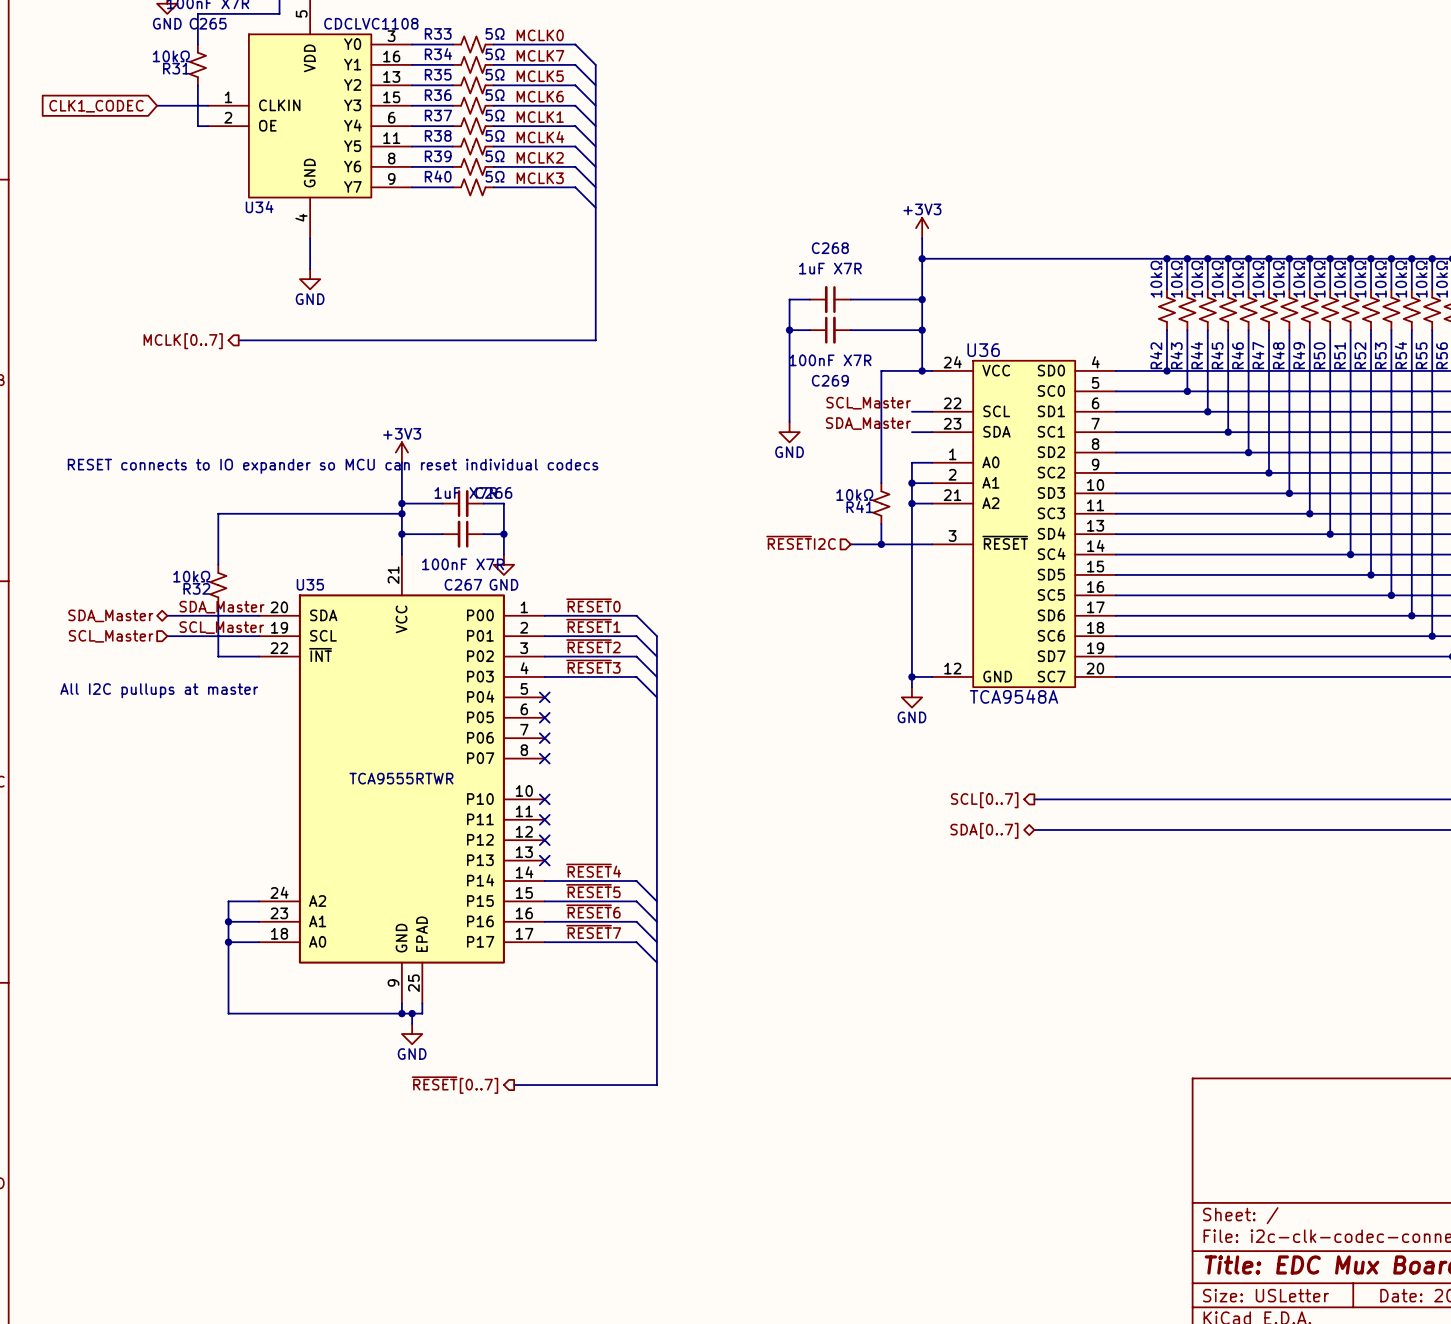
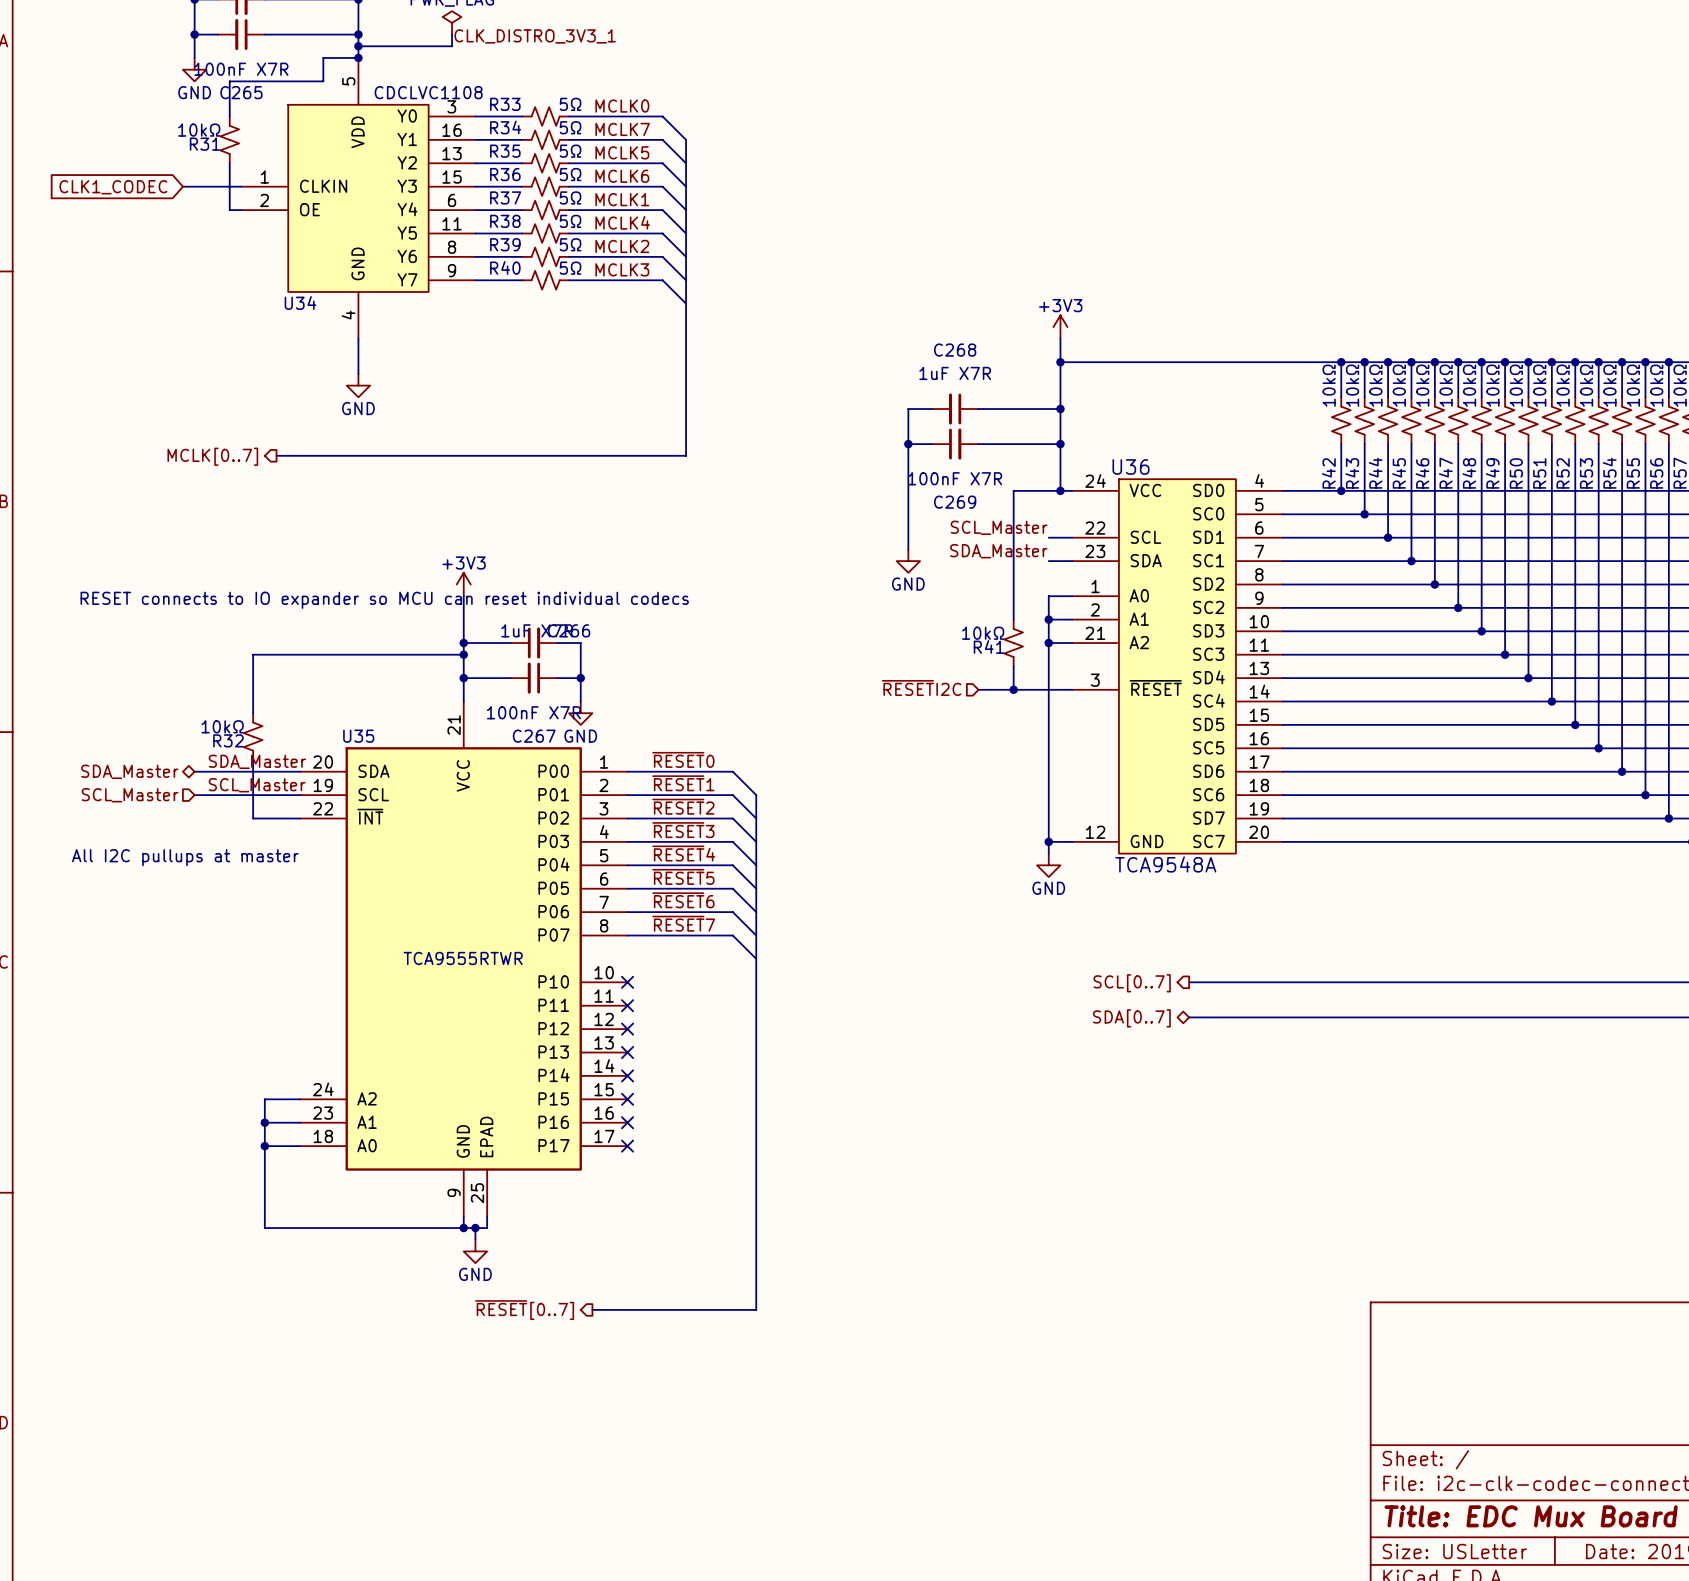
no-connect mark: (544, 697) -> none
no-connect mark: (544, 717) -> none
no-connect mark: (544, 738) -> none
no-connect mark: (544, 758) -> none
label position: ~{RESET}4 (593, 870) -> ~{RESET}4 (683, 853)
wire: (544, 881) (636, 881) (656, 901) -> (627, 865) (732, 865) (756, 888)
no-connect mark: none -> (627, 1075)
label position: ~{RESET}5 (593, 891) -> ~{RESET}5 (683, 876)
wire: (544, 901) (636, 901) (656, 921) -> (627, 888) (732, 888) (756, 912)
no-connect mark: none -> (627, 1099)
label position: ~{RESET}6 (593, 911) -> ~{RESET}6 (683, 900)
wire: (544, 921) (636, 921) (656, 942) -> (627, 912) (732, 912) (756, 935)
no-connect mark: none -> (627, 1122)
label position: ~{RESET}7 (593, 931) -> ~{RESET}7 (683, 923)
wire: (544, 942) (636, 942) (656, 962) -> (627, 935) (732, 935) (756, 958)
no-connect mark: none -> (627, 1146)

